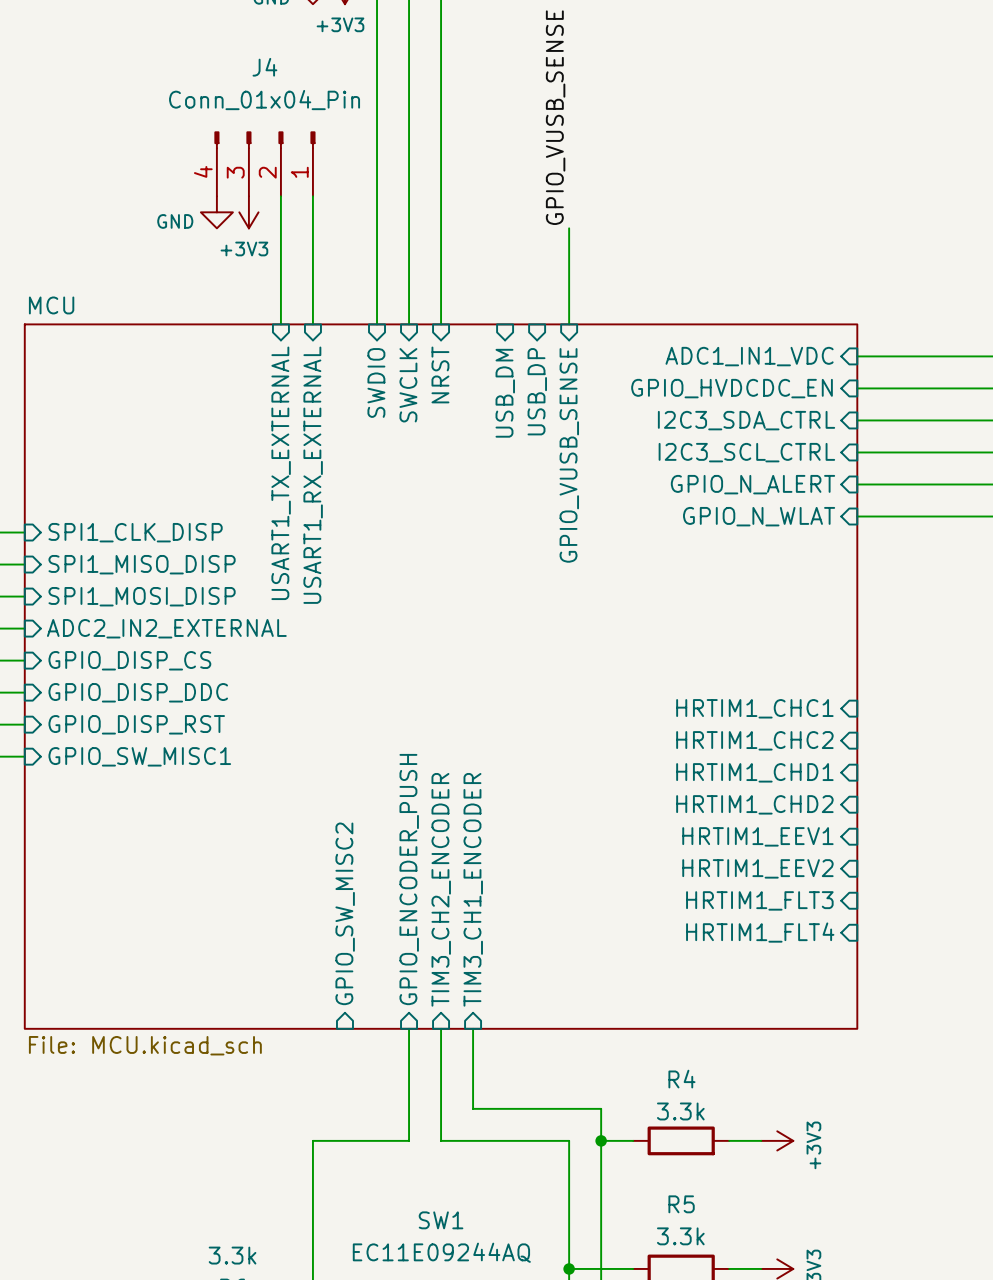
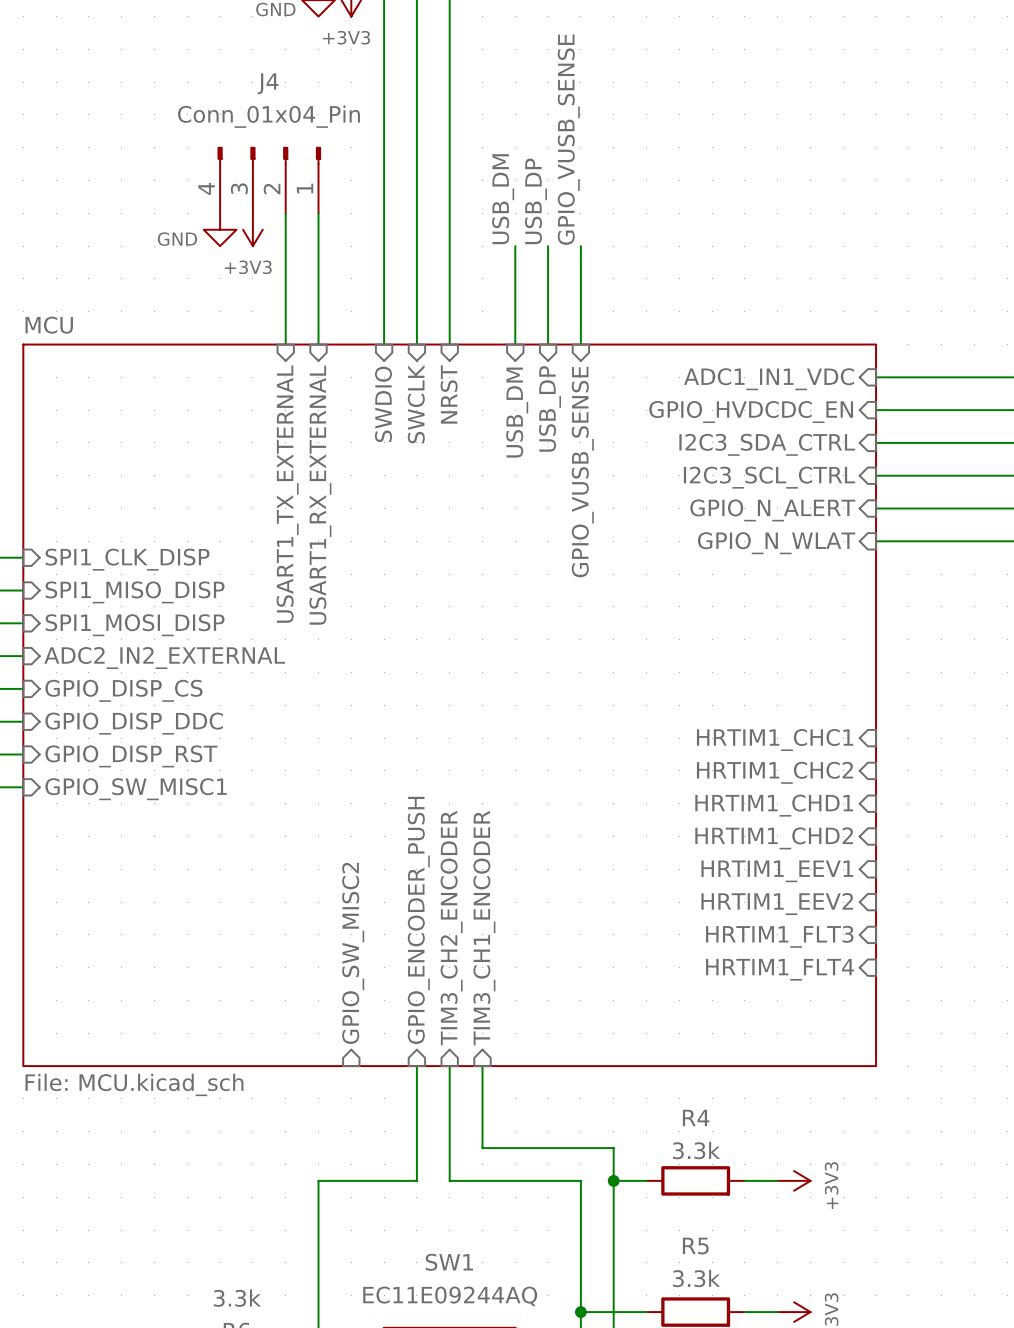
label: none -> USB_DM (503, 199)
label: none -> USB_DP (535, 201)
wire: none -> (515, 246) (515, 344)
wire: none -> (548, 246) (548, 344)

